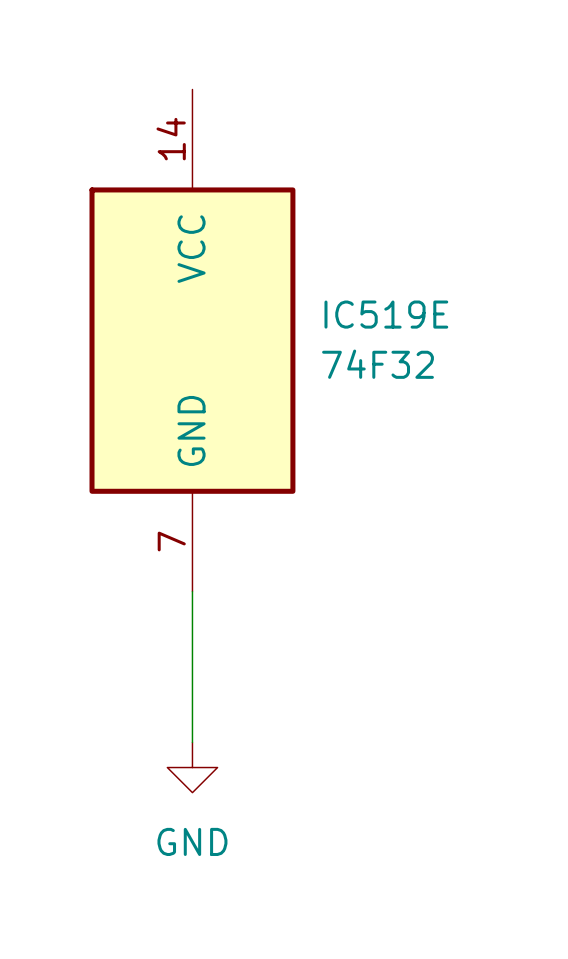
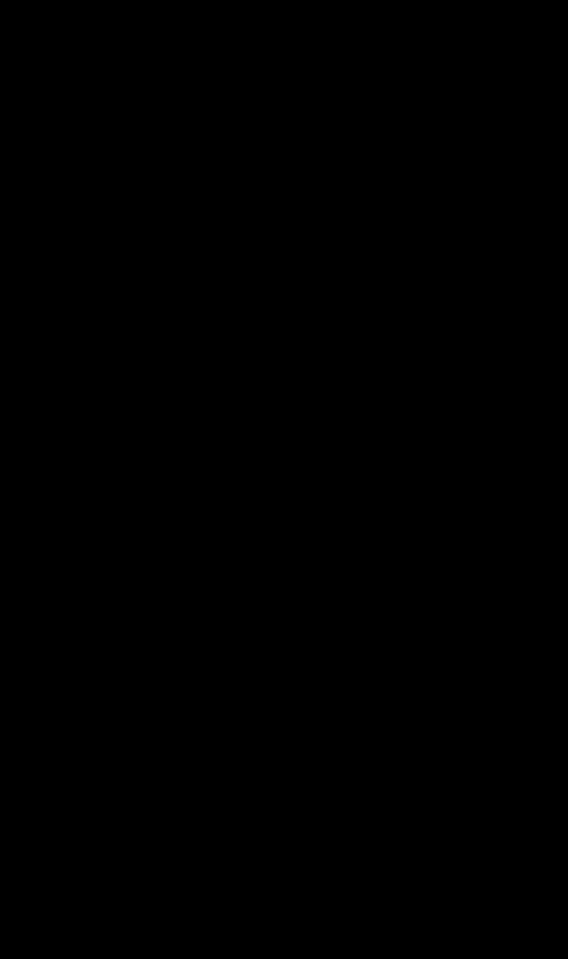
IC519E: 74F32 (192, 340) -> none
wire: (192, 591) (192, 742) -> none
power symbol: GND (192, 767) -> none

